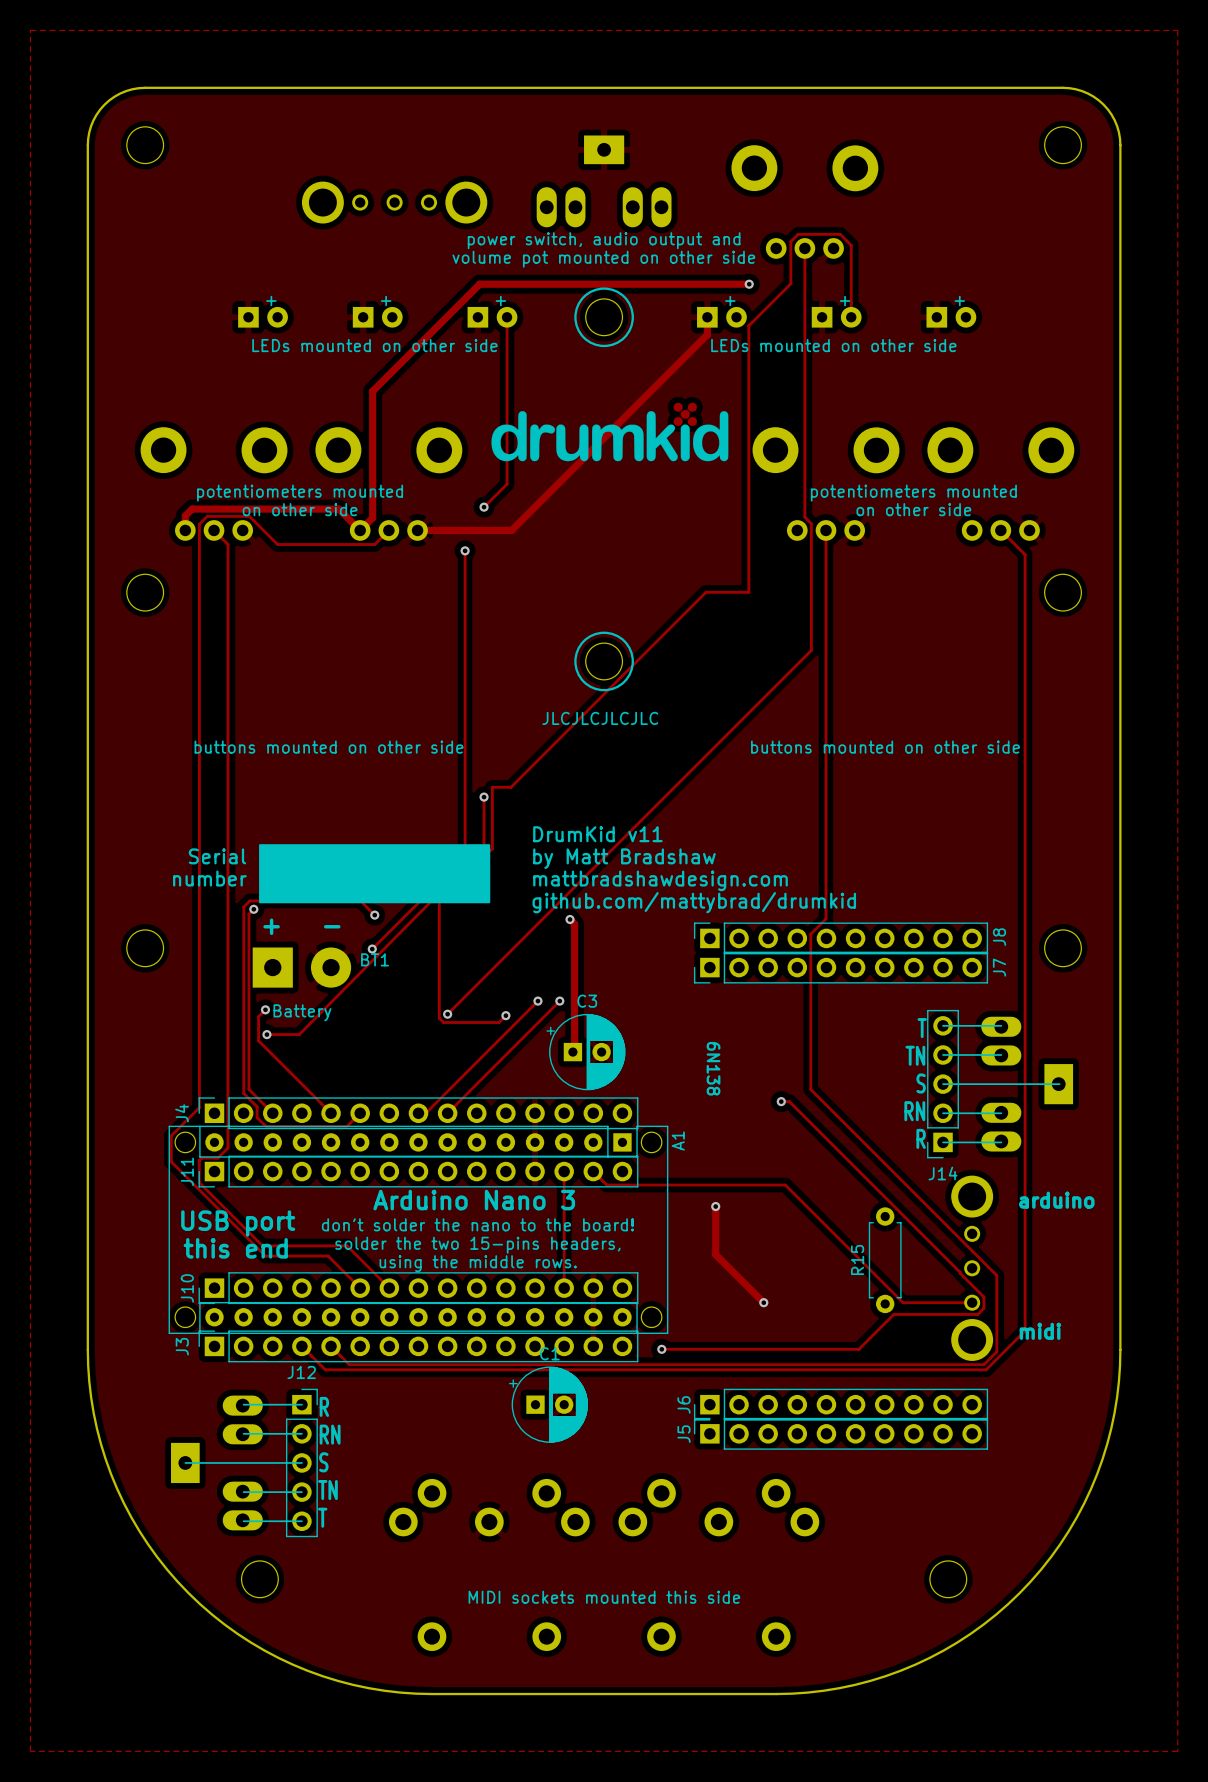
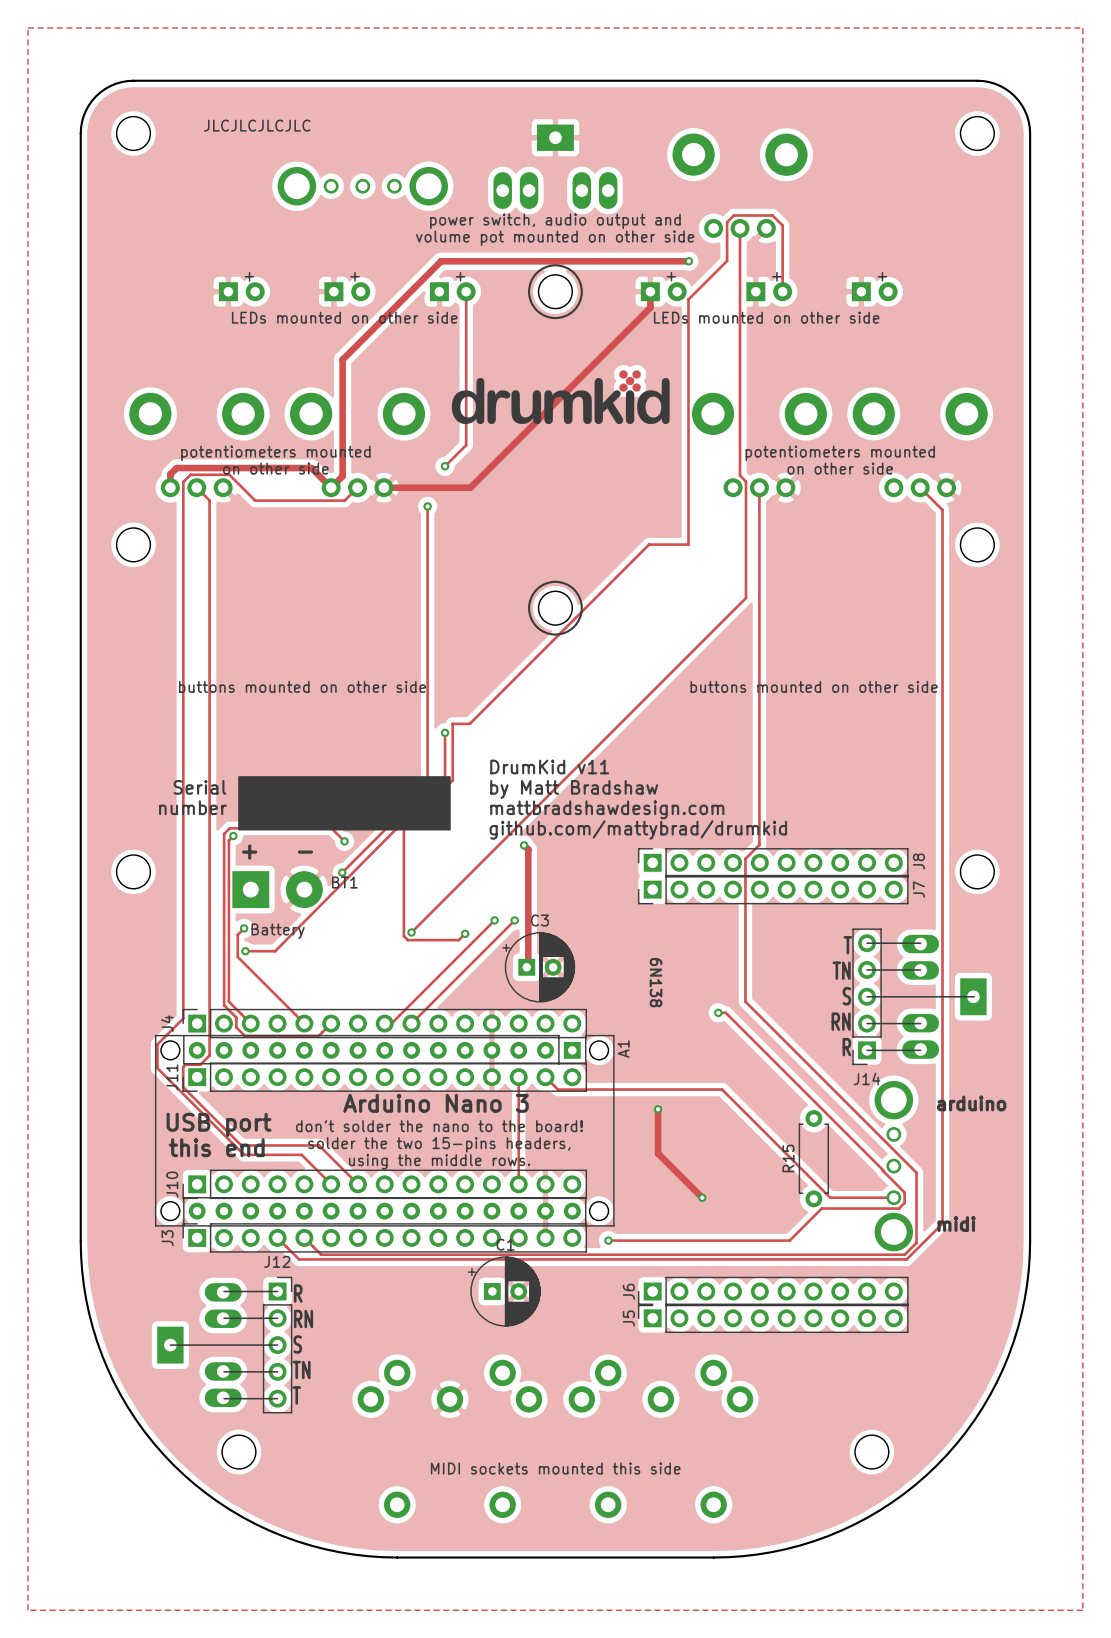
text: none -> JLCJLCJLCJLC (257, 125)
text: JLCJLCJLCJLC (600, 718) -> none

